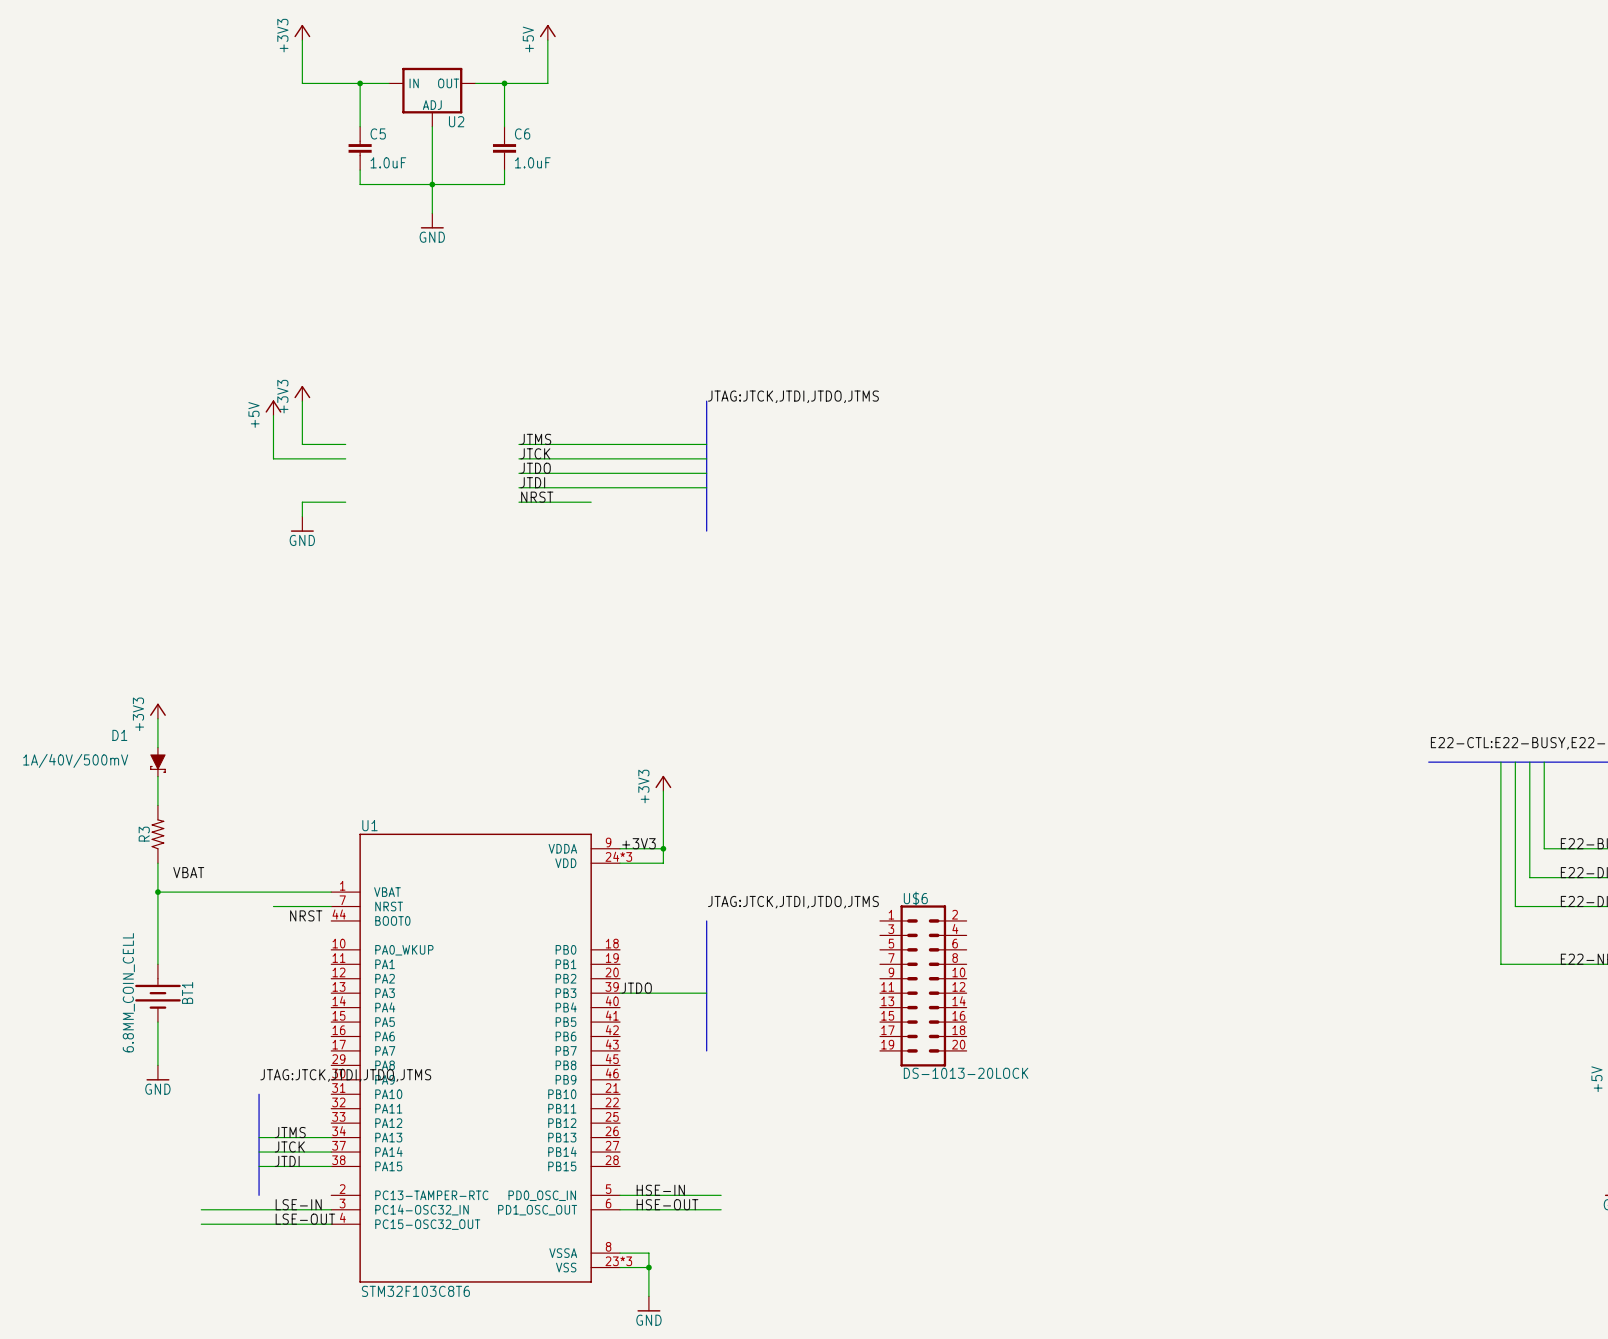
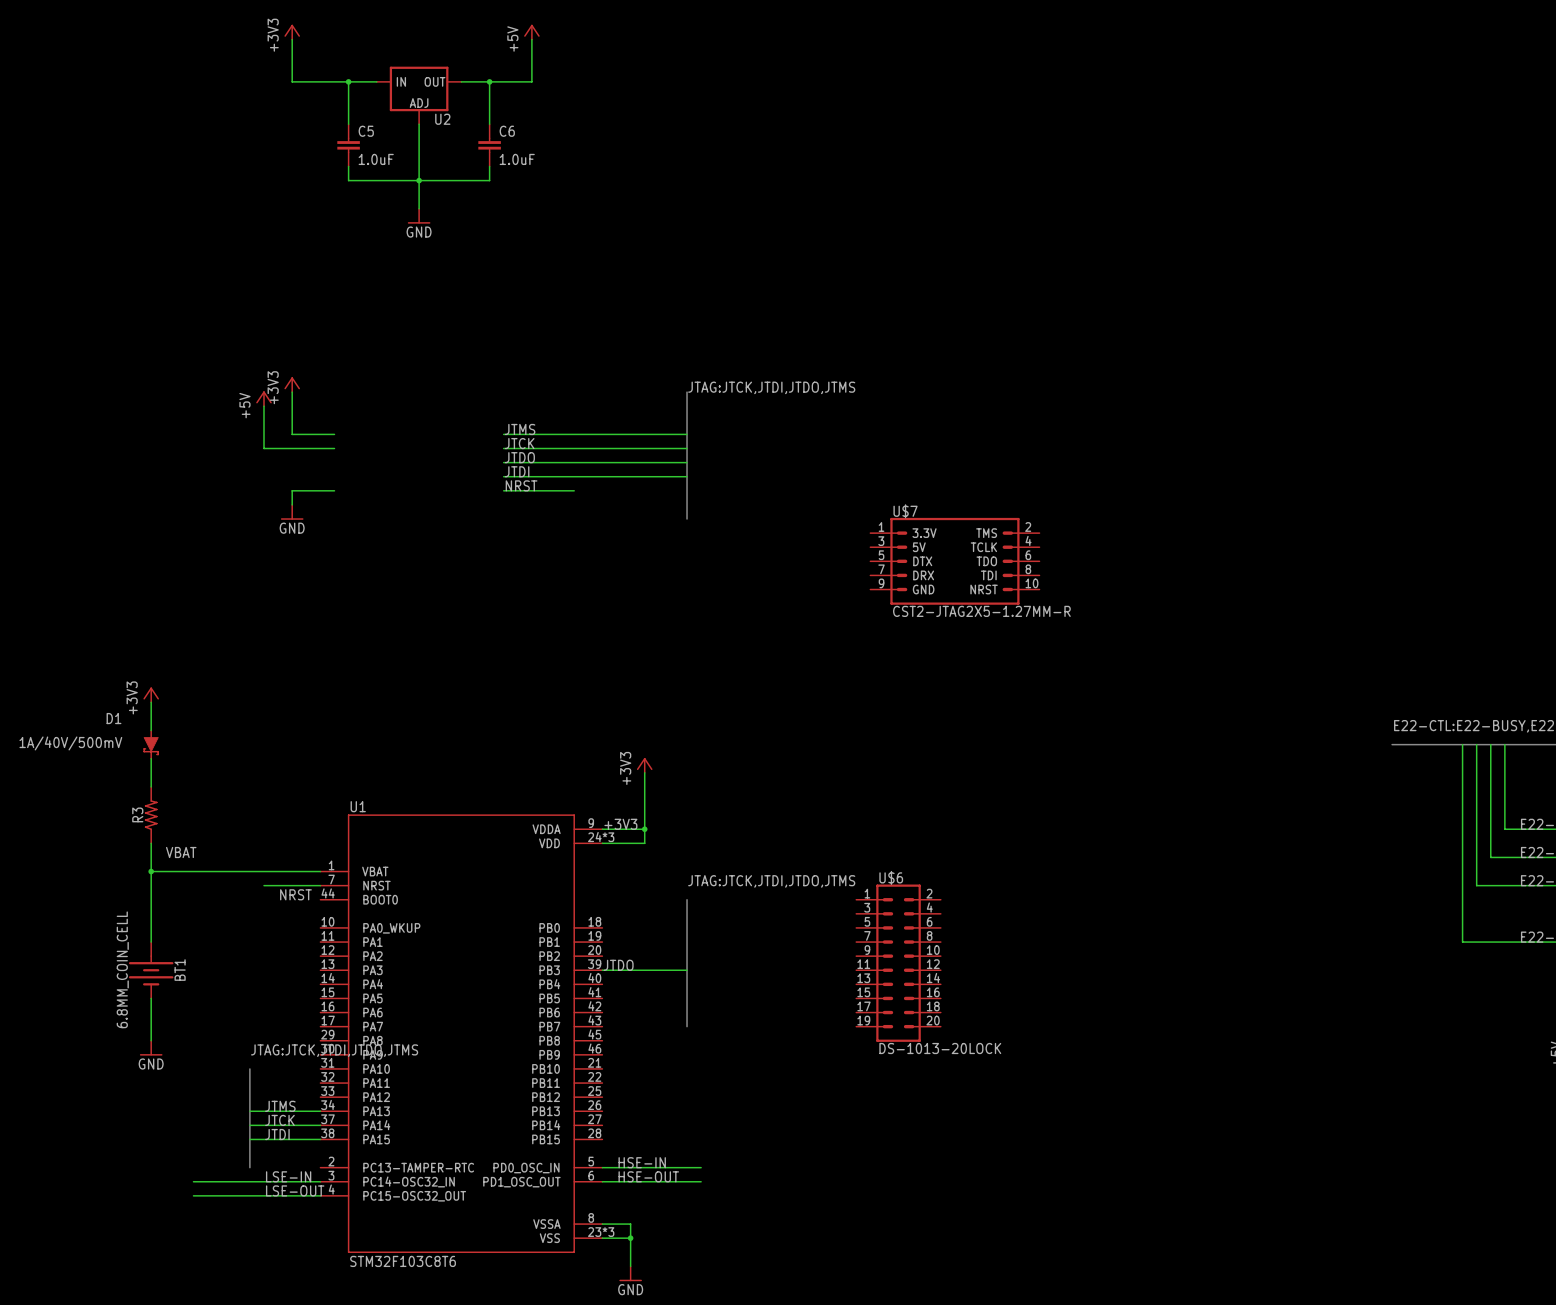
U$7: none -> CST2-JTAG2X5-1.27MM-R (954, 561)

